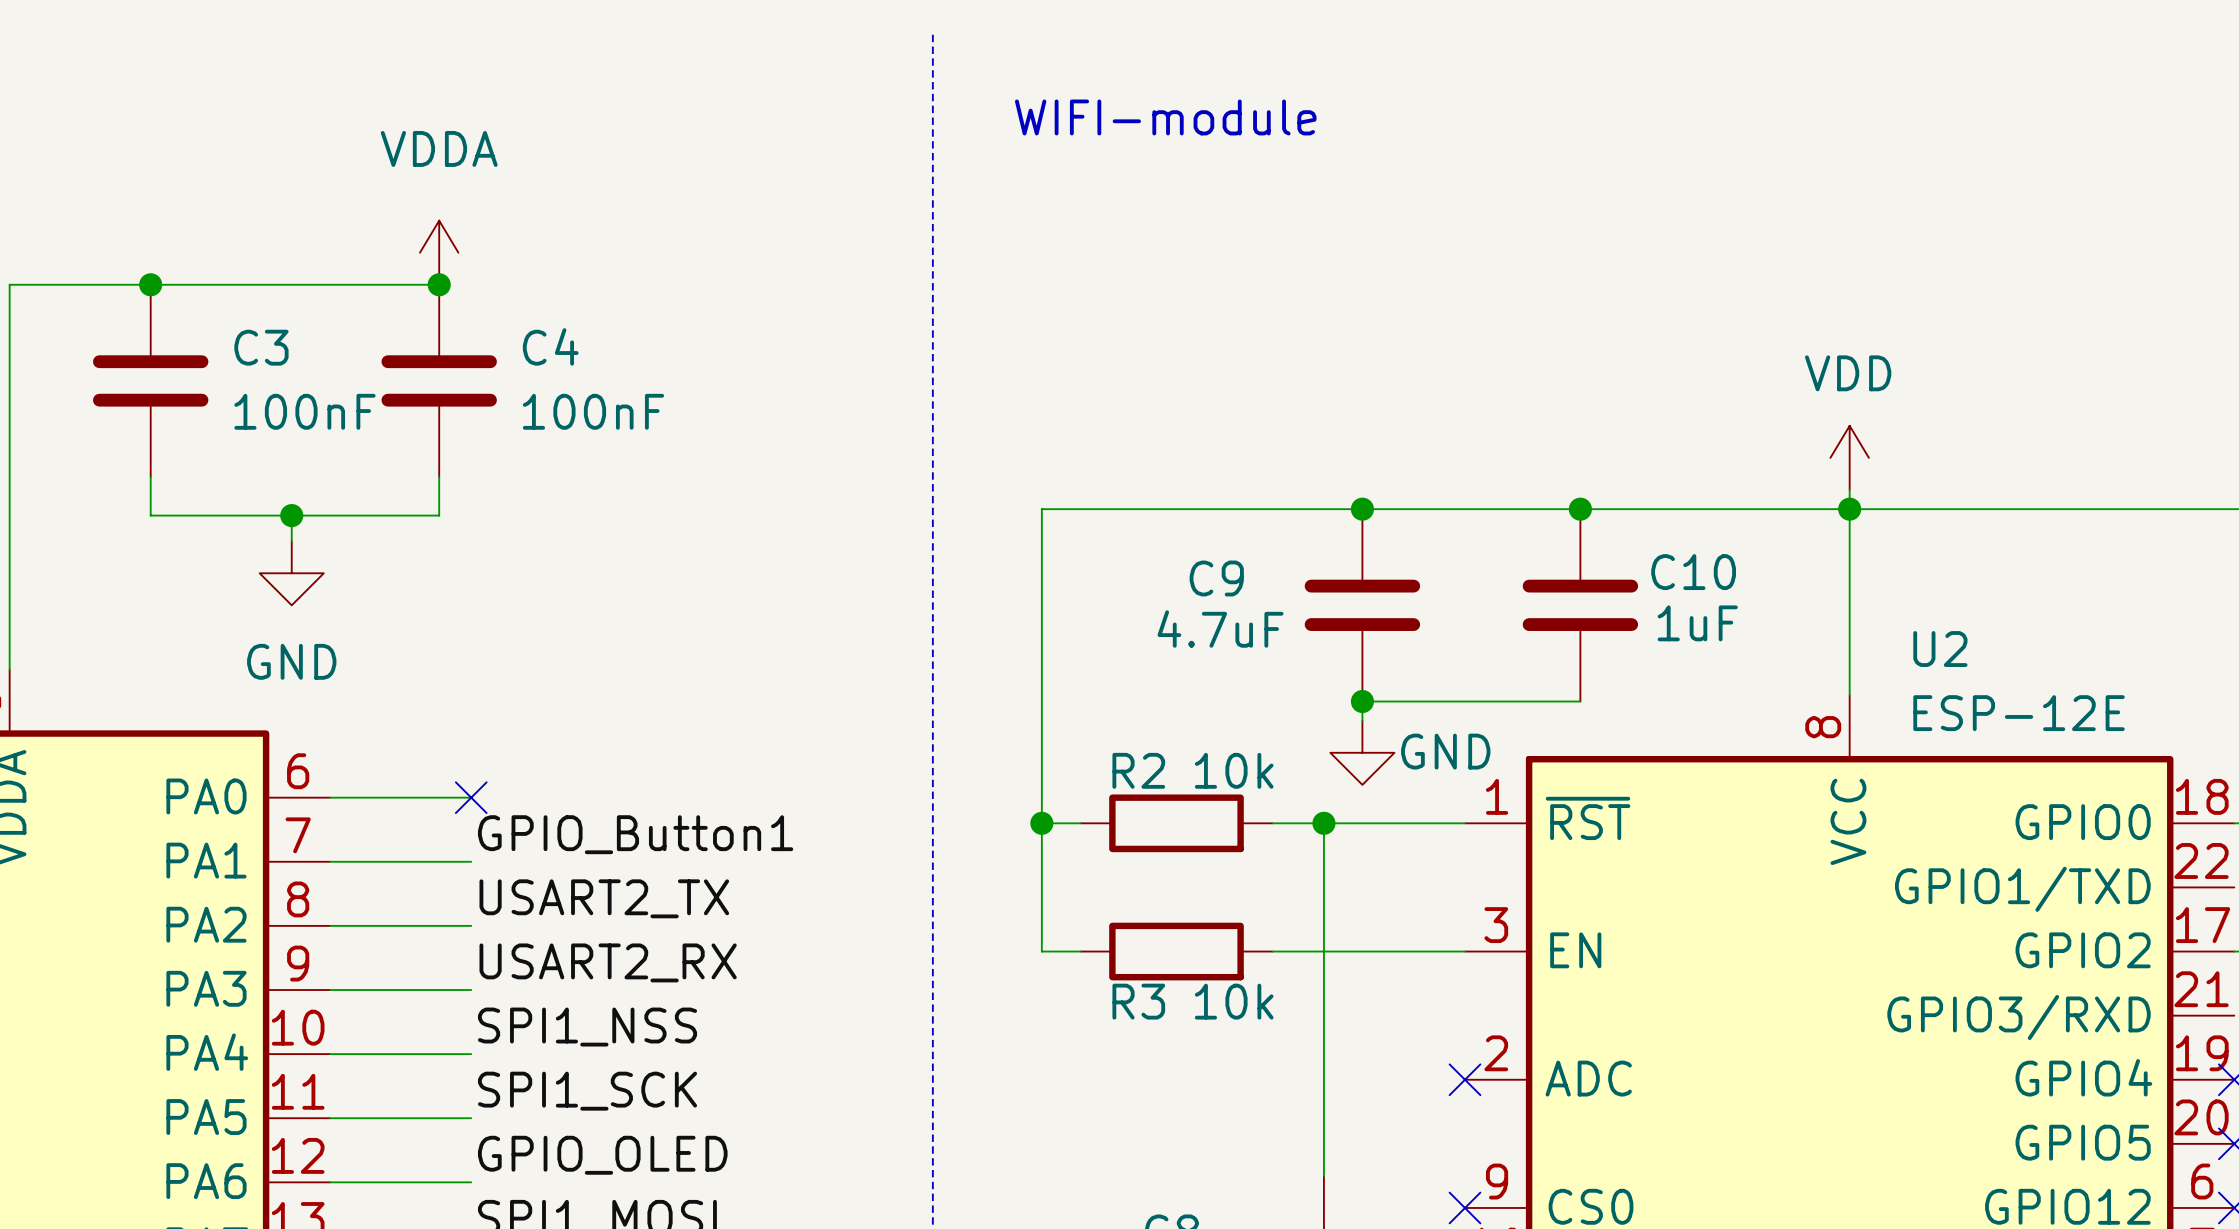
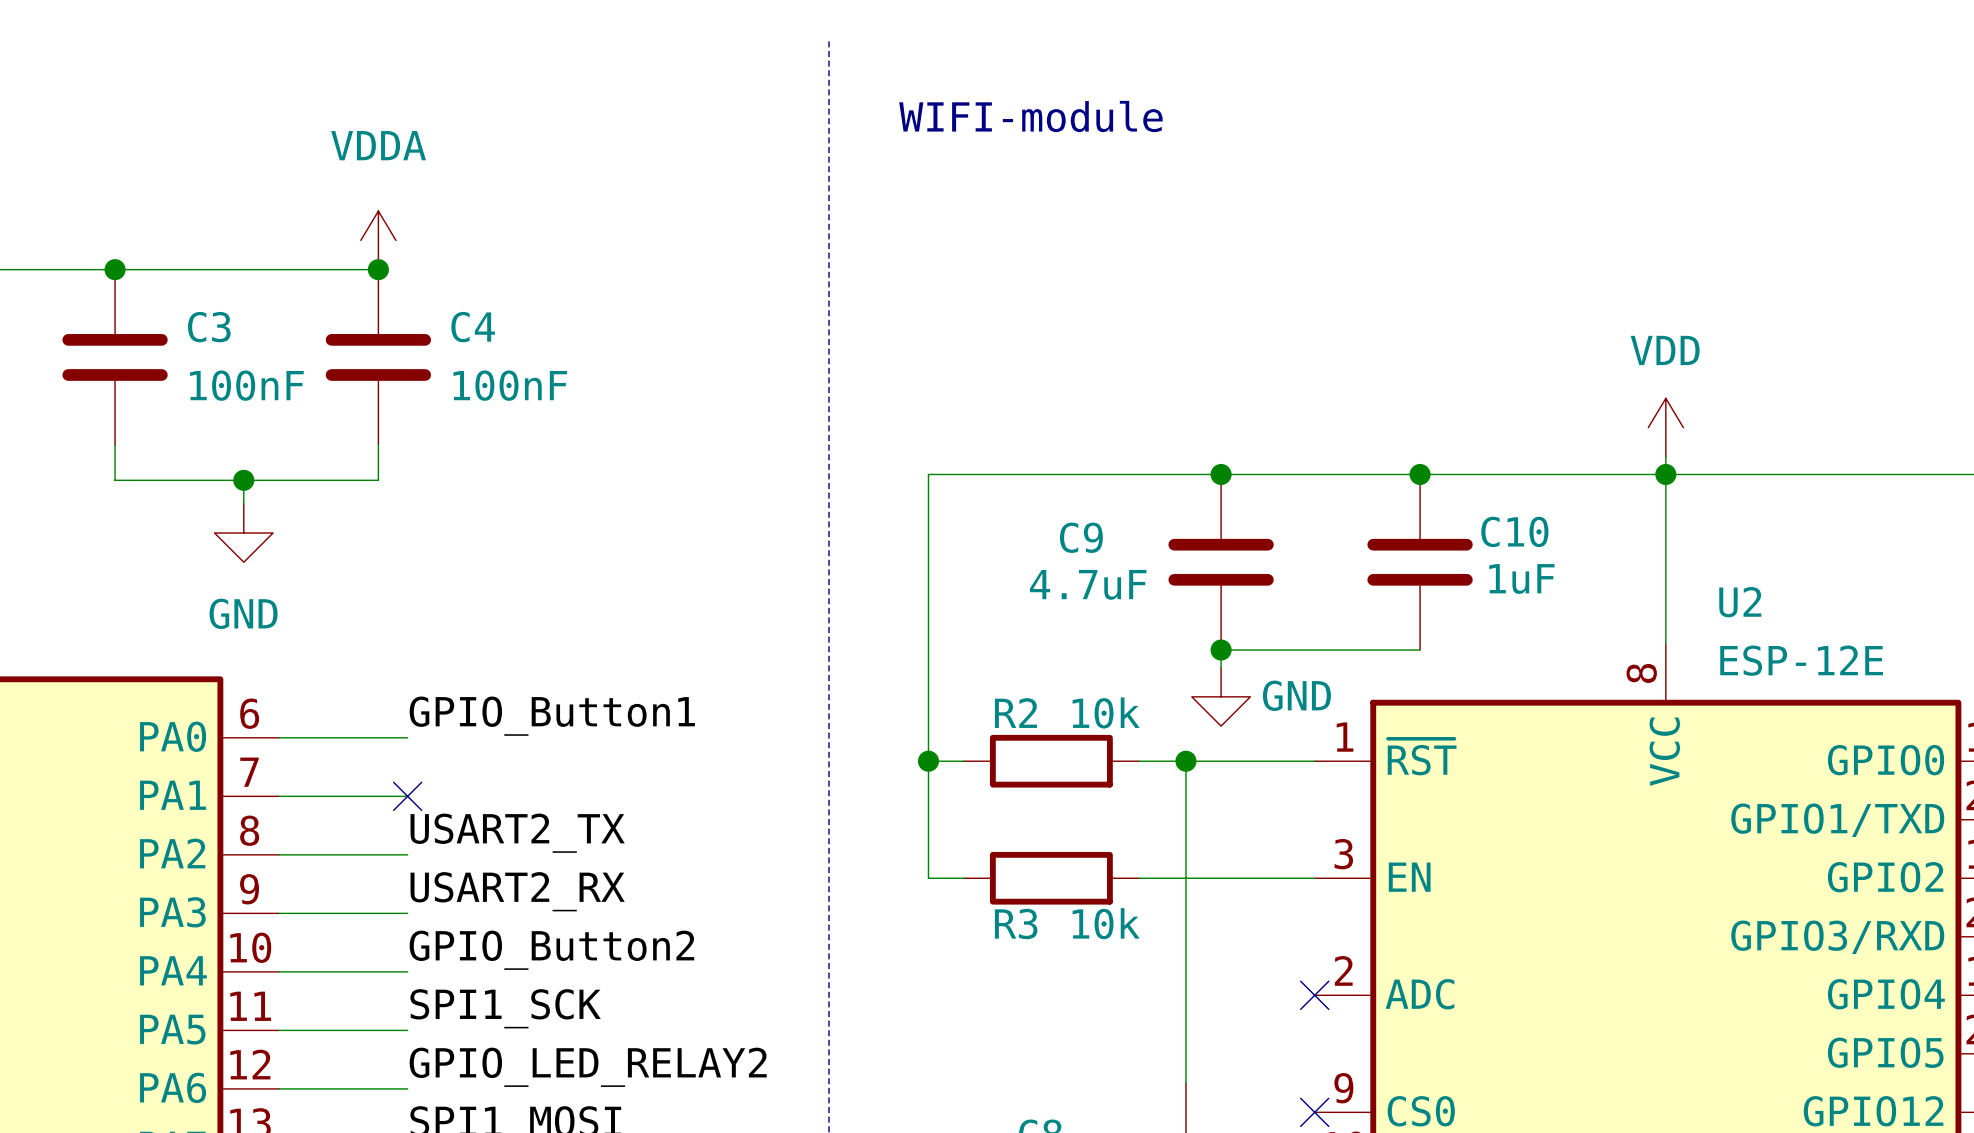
no-connect mark position: (471, 797) -> (407, 796)
label position: GPIO_Button1 (635, 834) -> GPIO_Button1 (552, 716)
label: SPI1_NSS (587, 1027) -> GPIO_Button2 (551, 950)
label: GPIO_OLED (602, 1155) -> GPIO_LED_RELAY2 (588, 1067)

